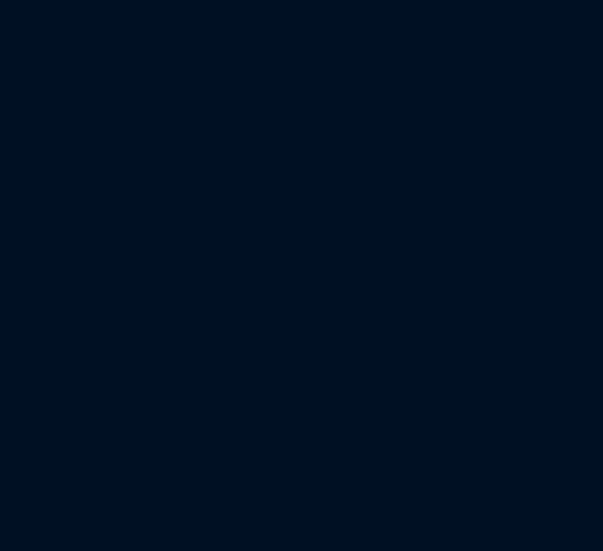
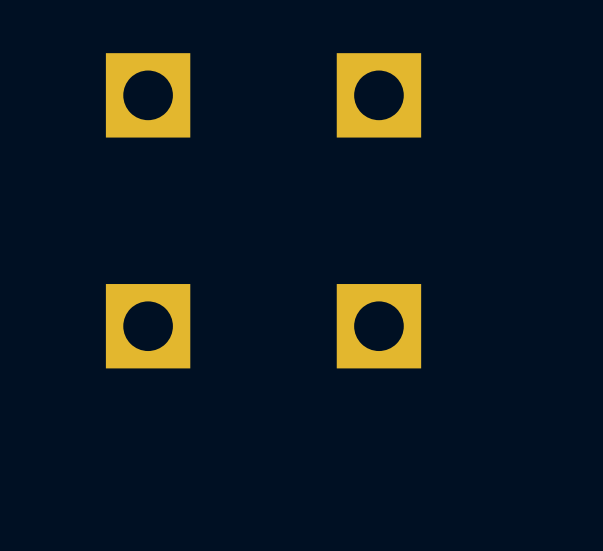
part: none -> (148, 95)
part: none -> (378, 95)
part: none -> (148, 326)
part: none -> (378, 326)

